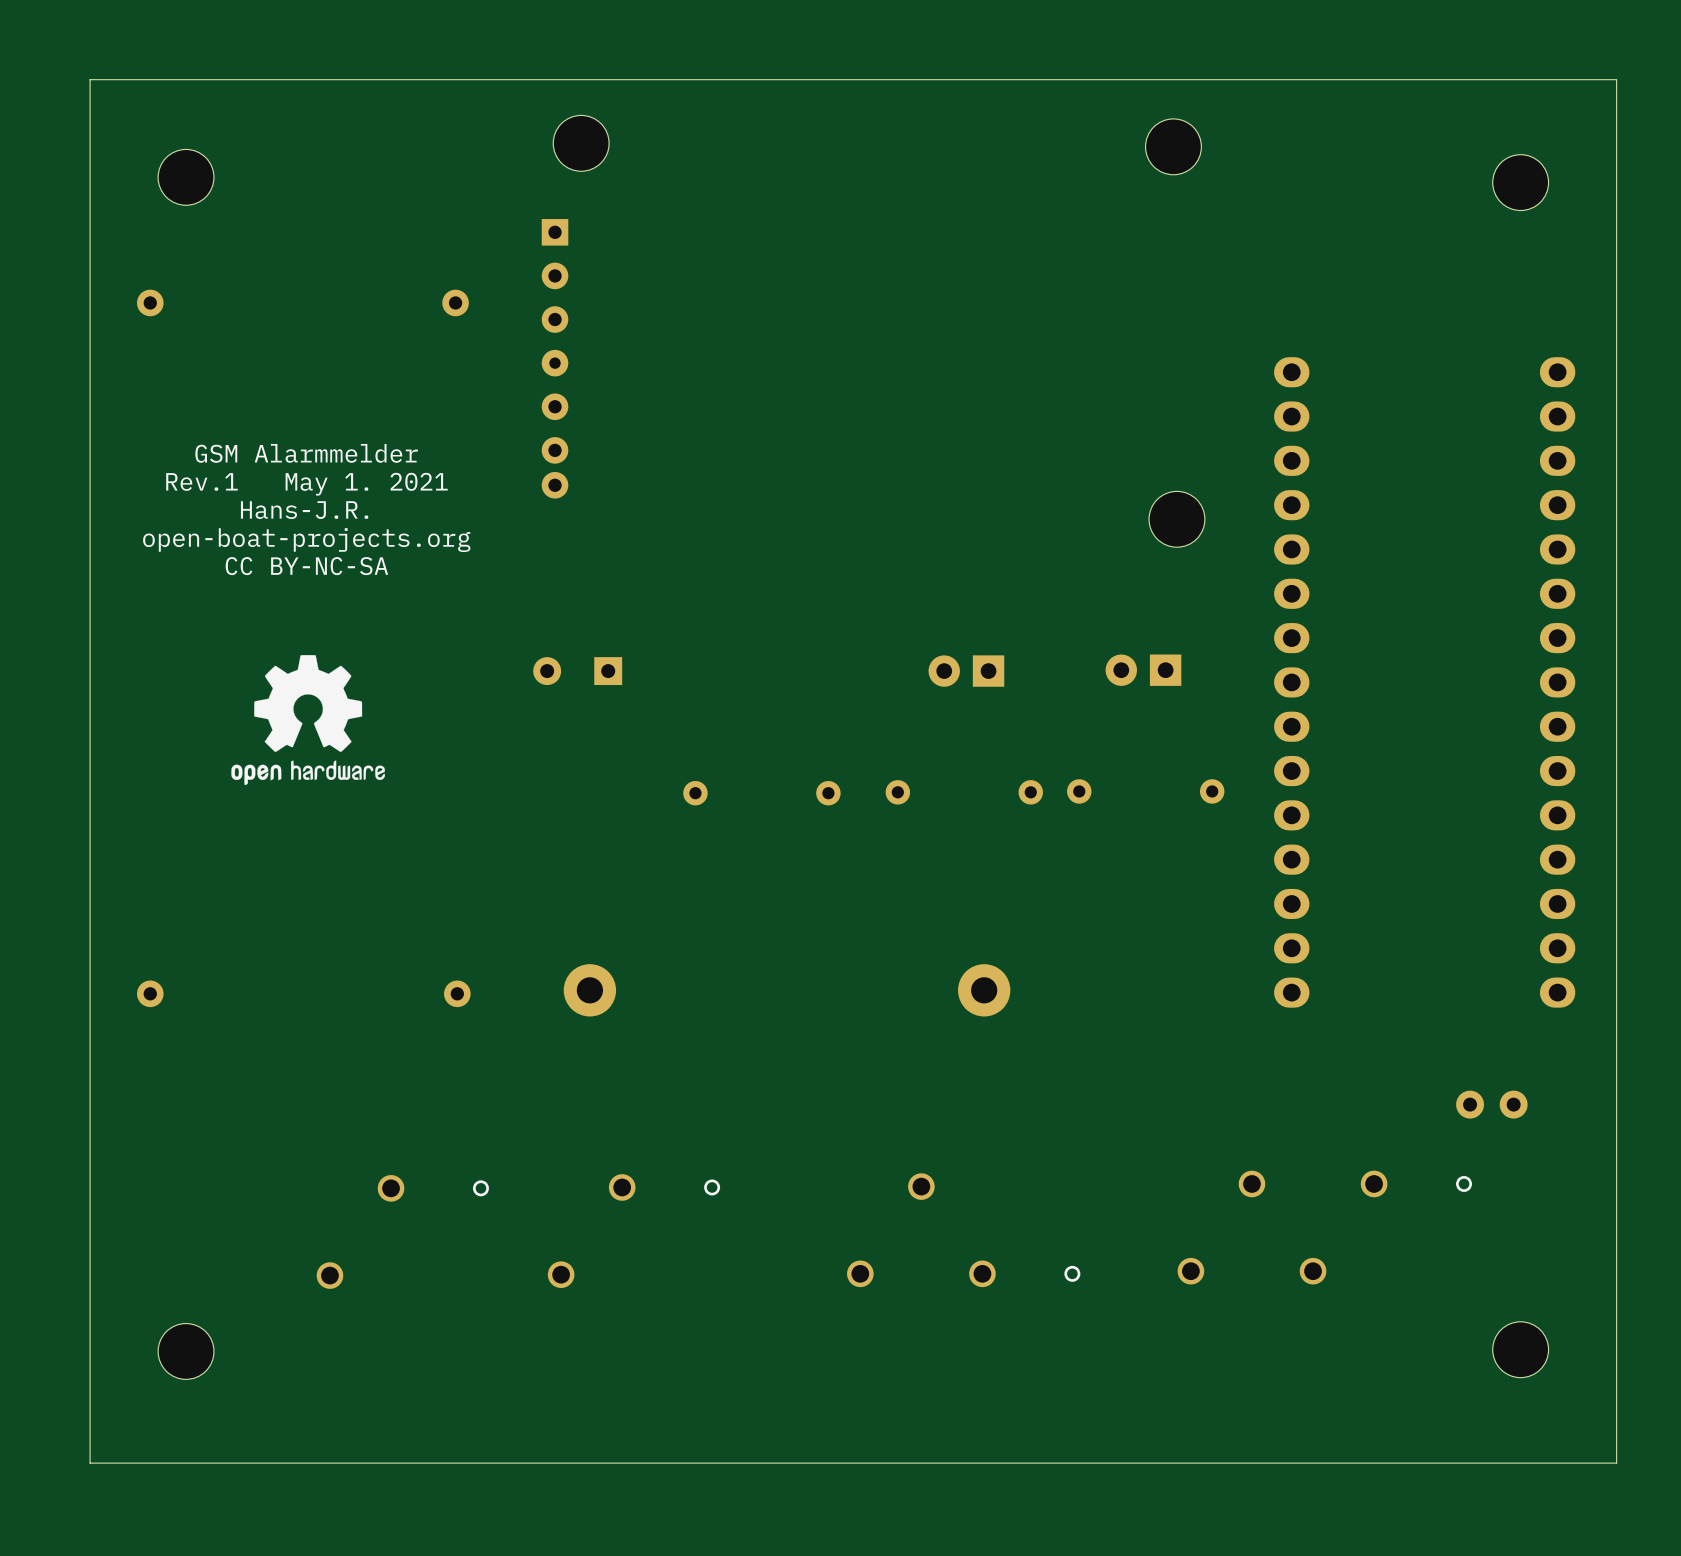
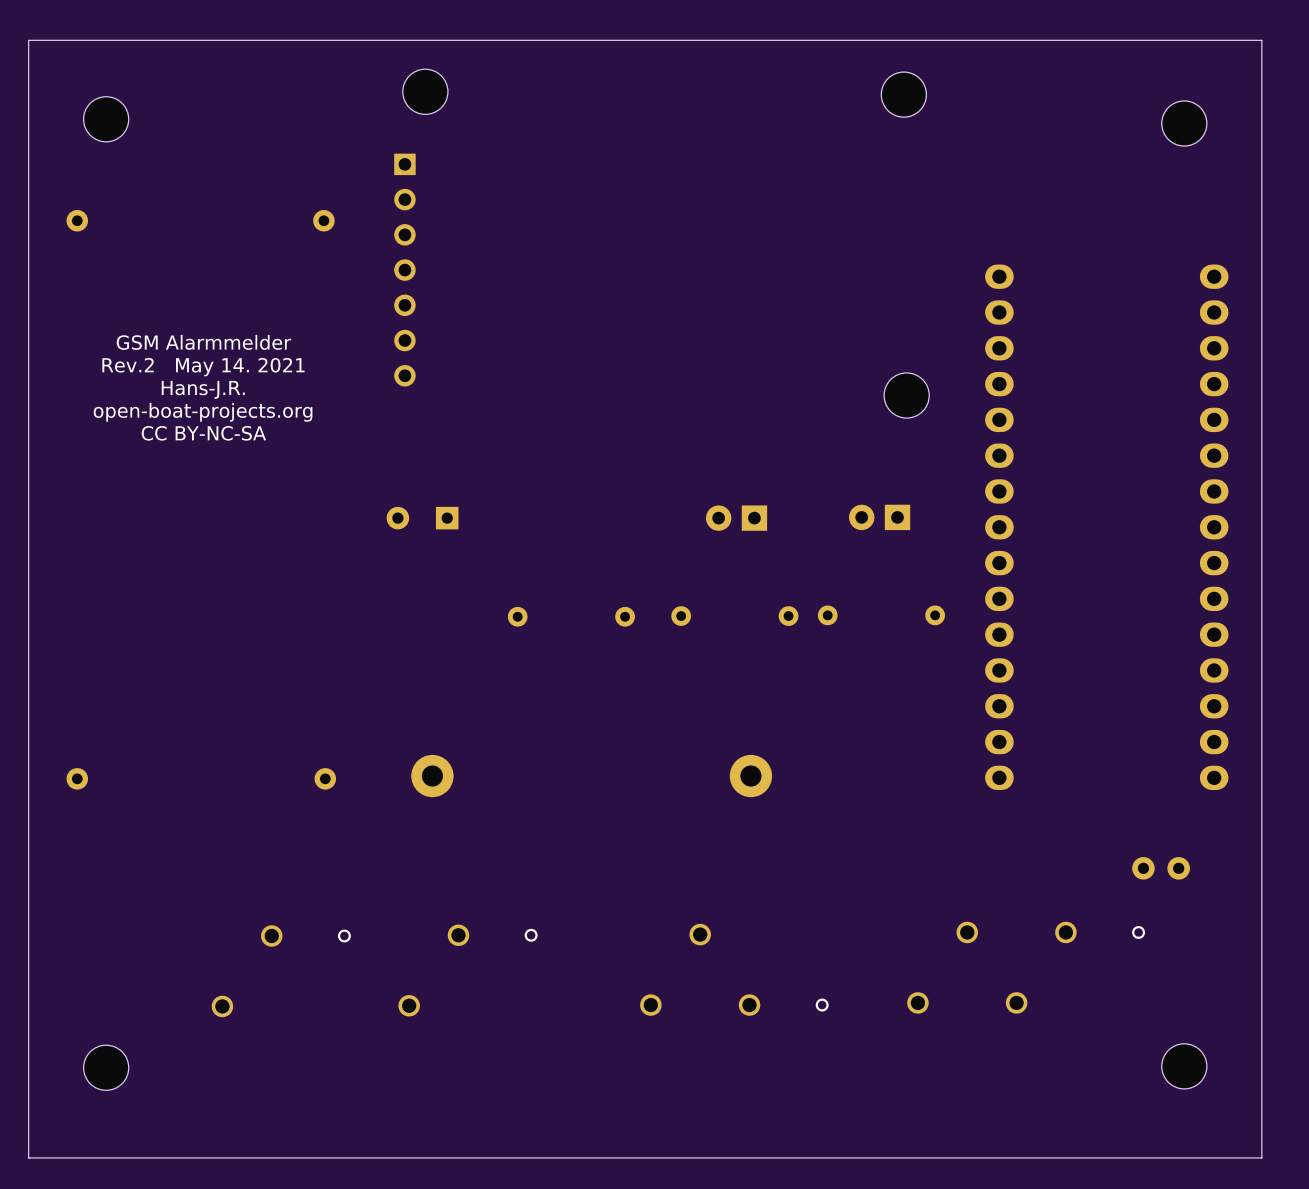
part footprint: [541, 219, 569, 499] -> [394, 153, 416, 387]
text: Rev.1 May 1. 2021 (306, 484) -> Rev.2 May 14. 2021 (203, 367)
drawing: [231, 655, 385, 786] -> none

